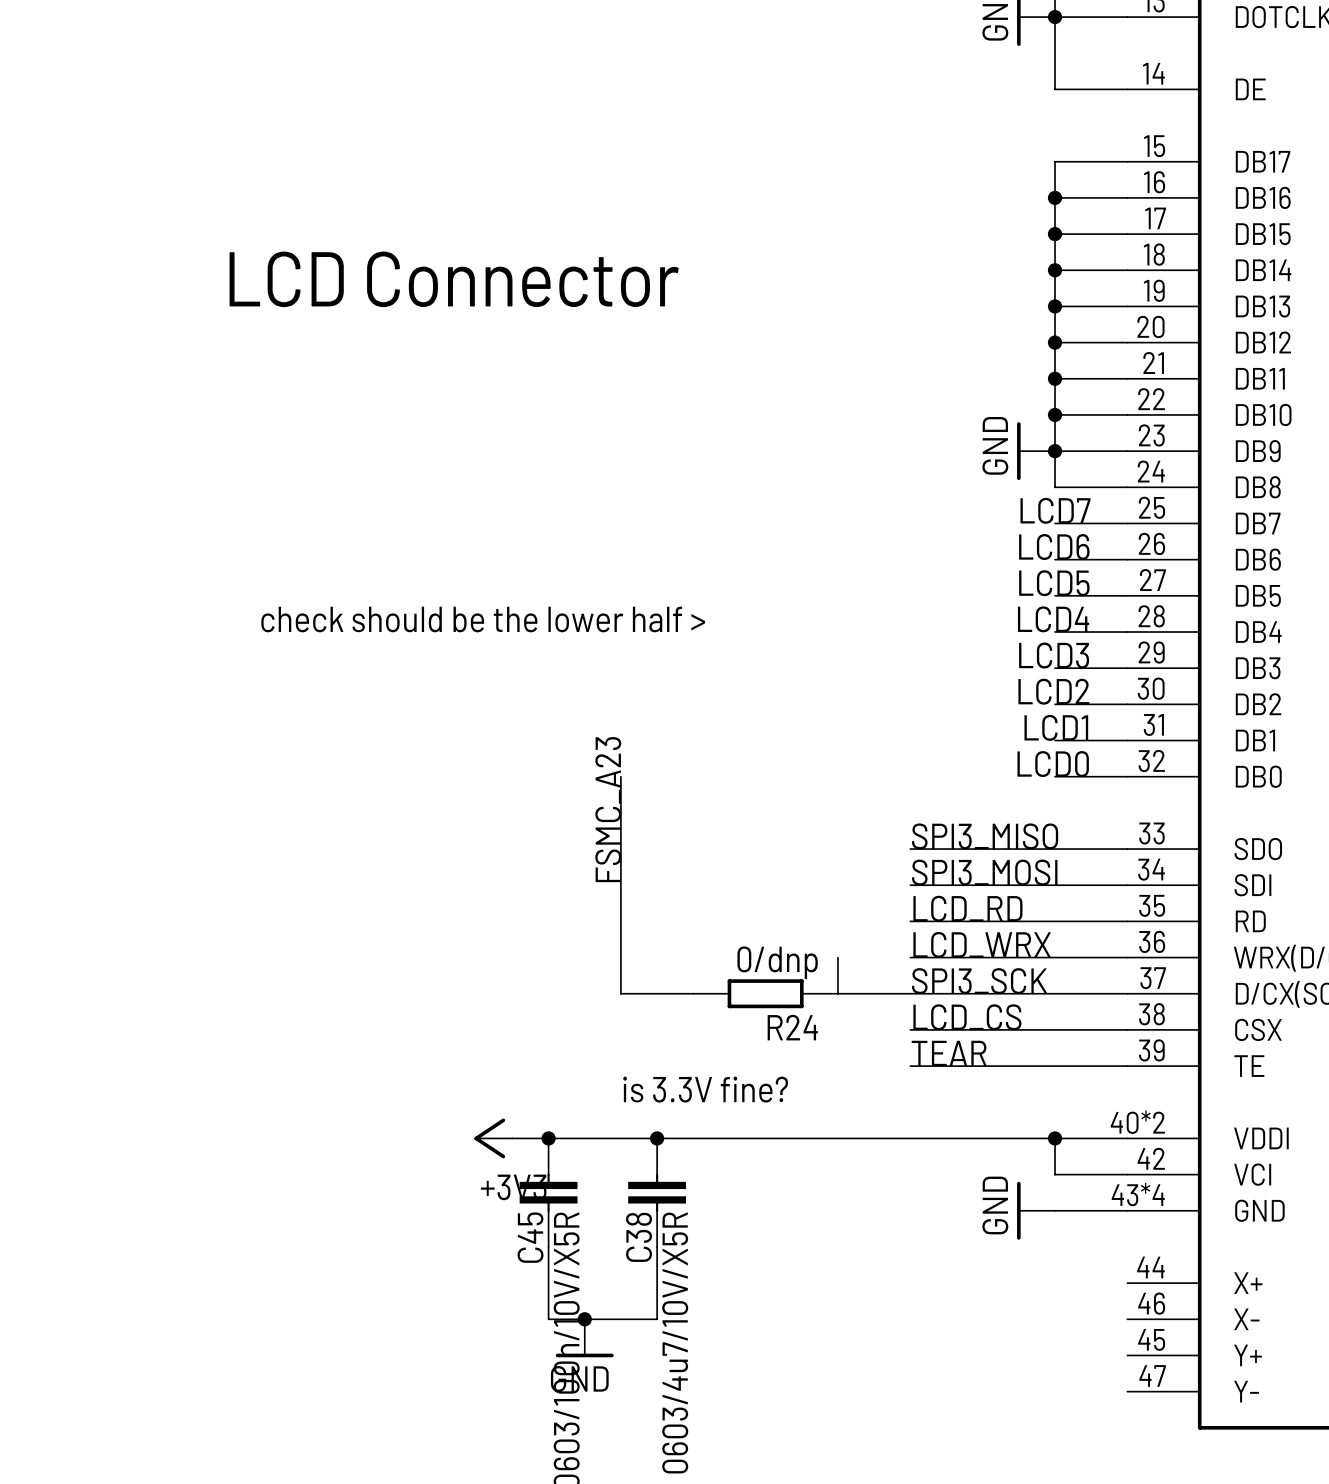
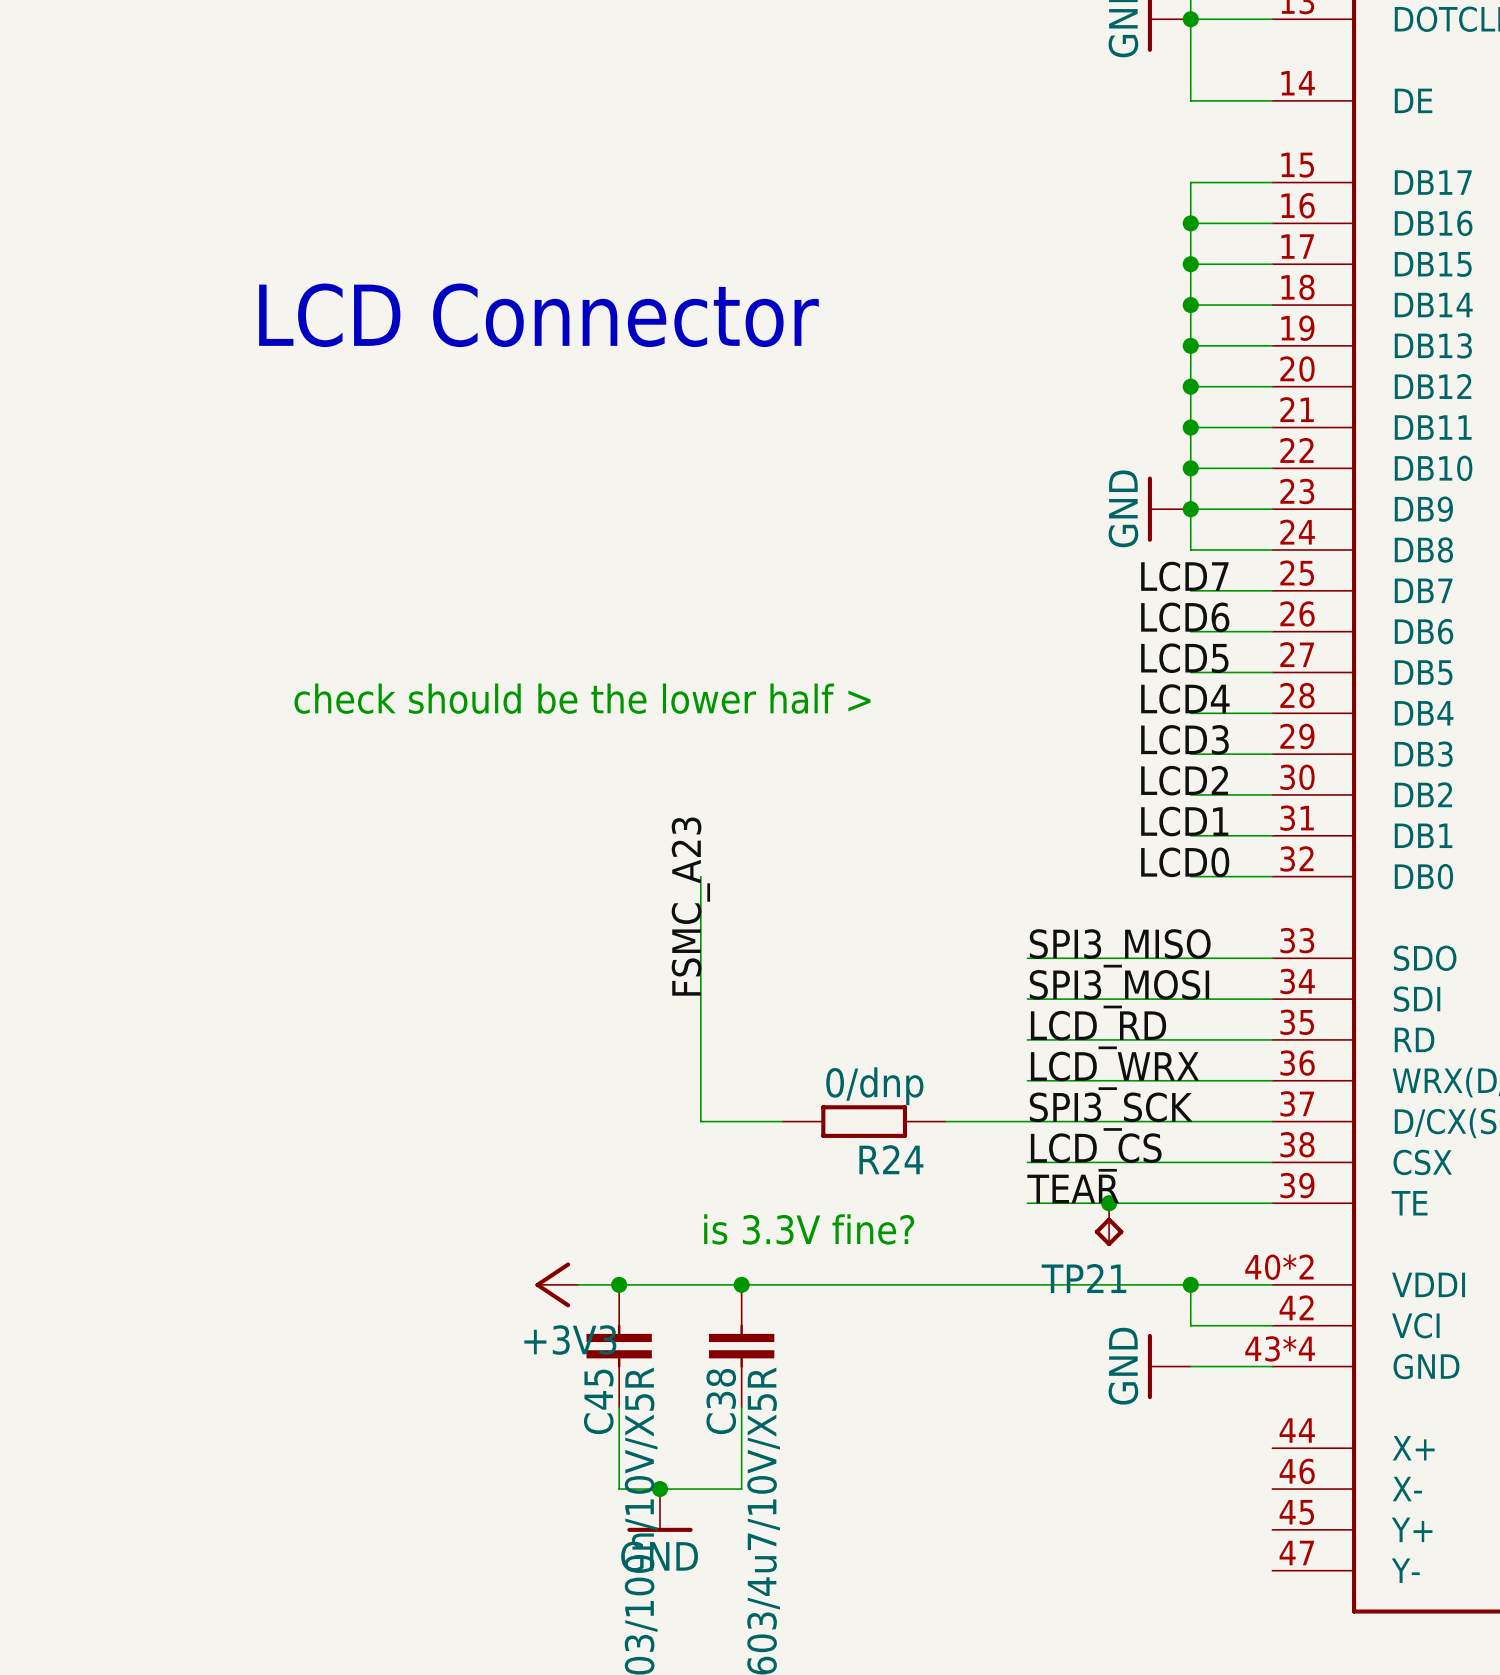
wire: (837, 957) (837, 993) -> none
junction: none -> (1109, 1203)
TP21: none -> (1109, 1224)

